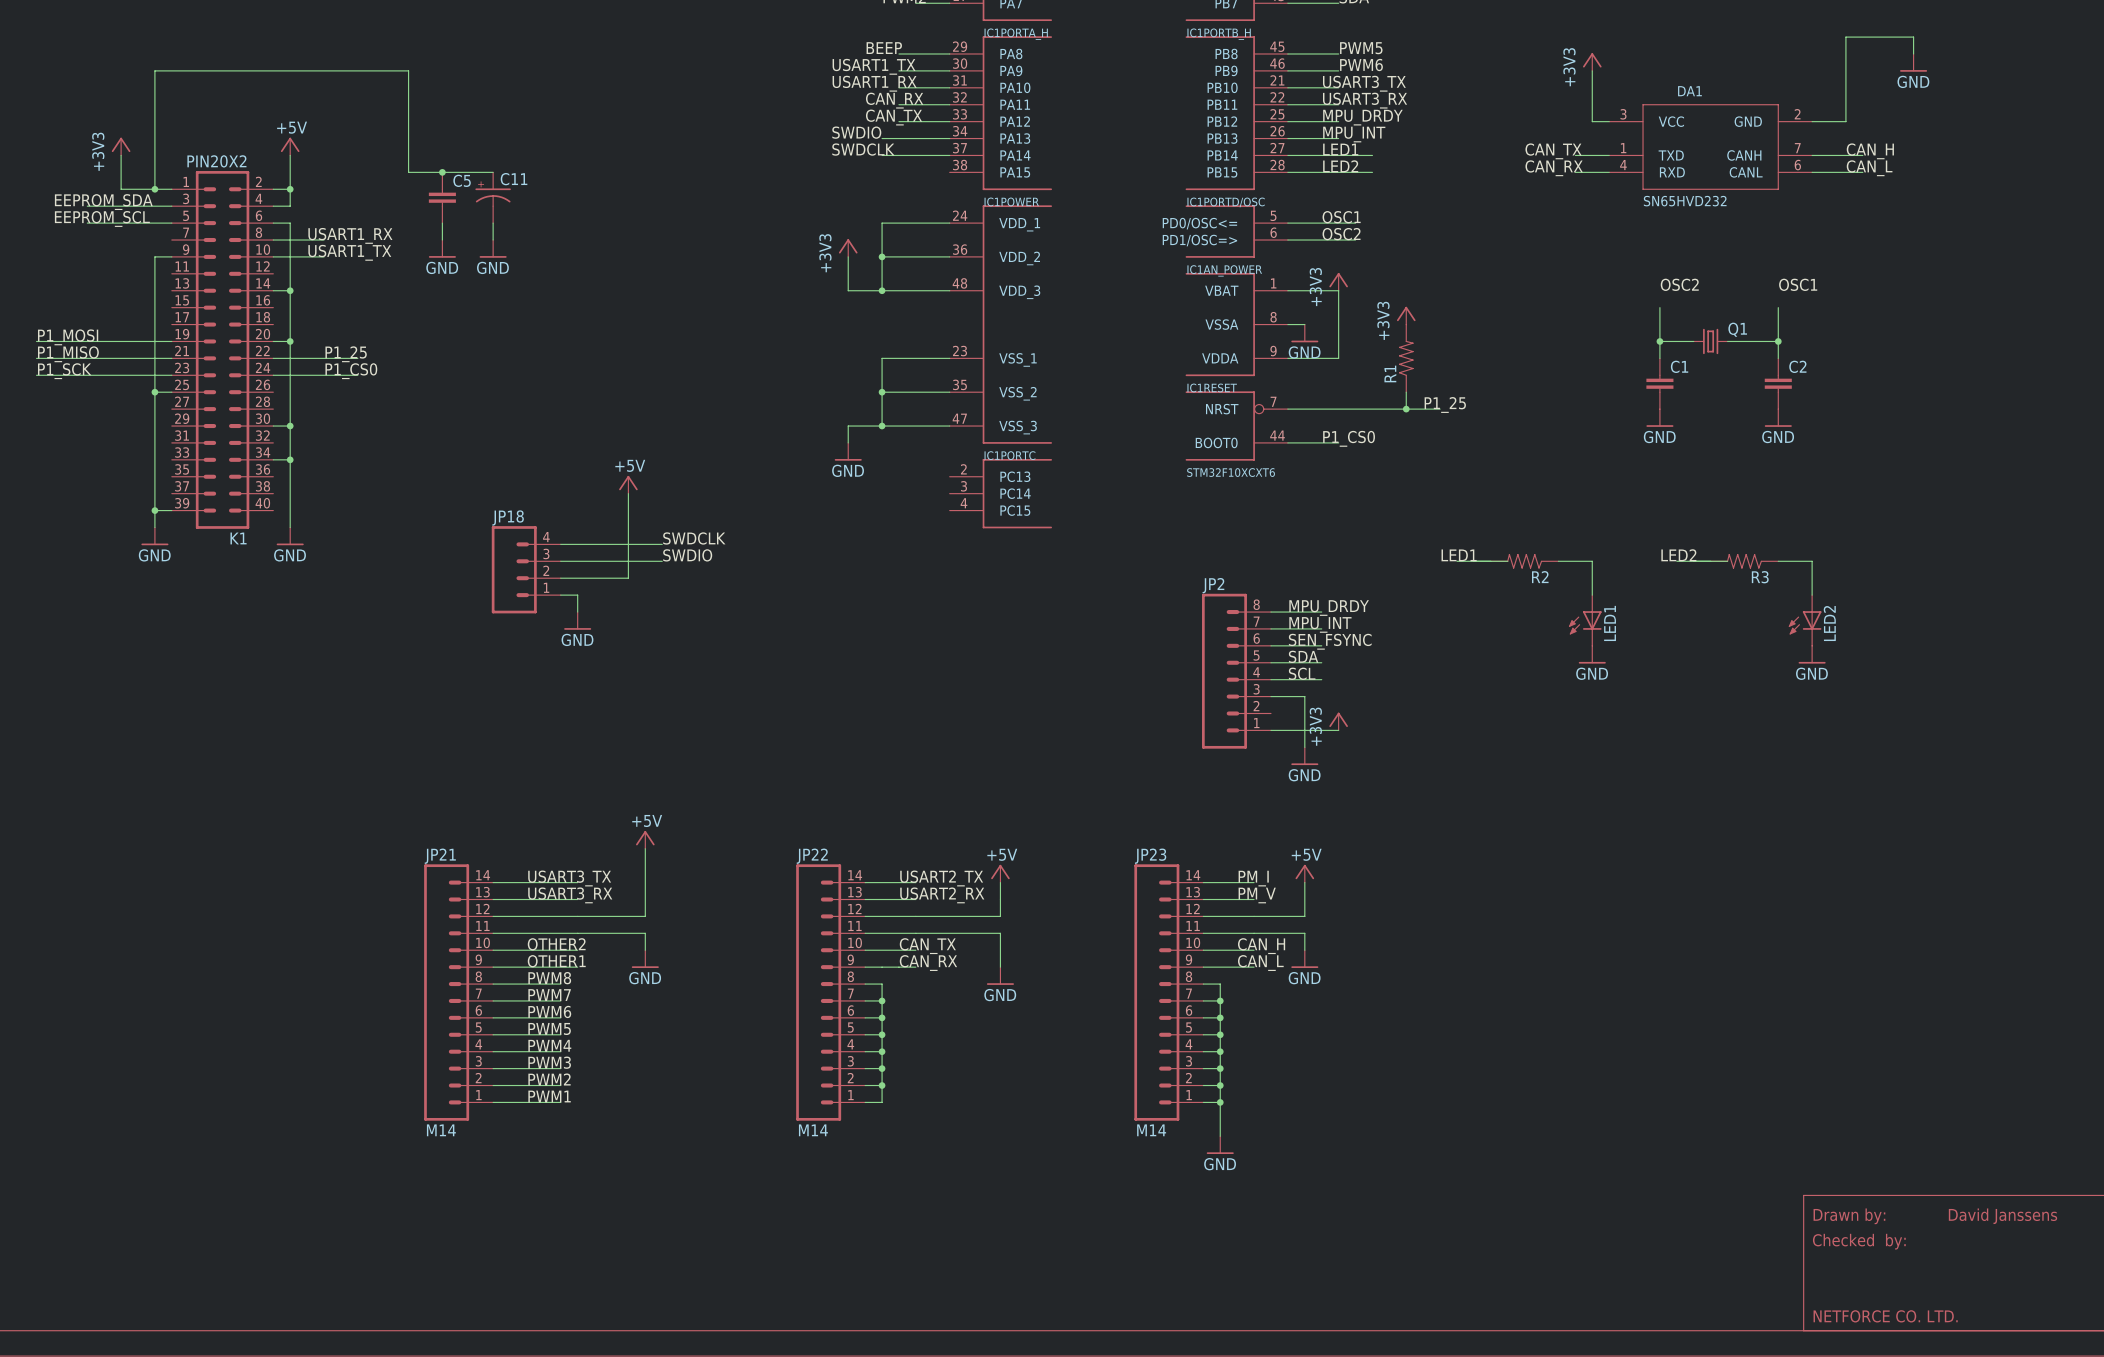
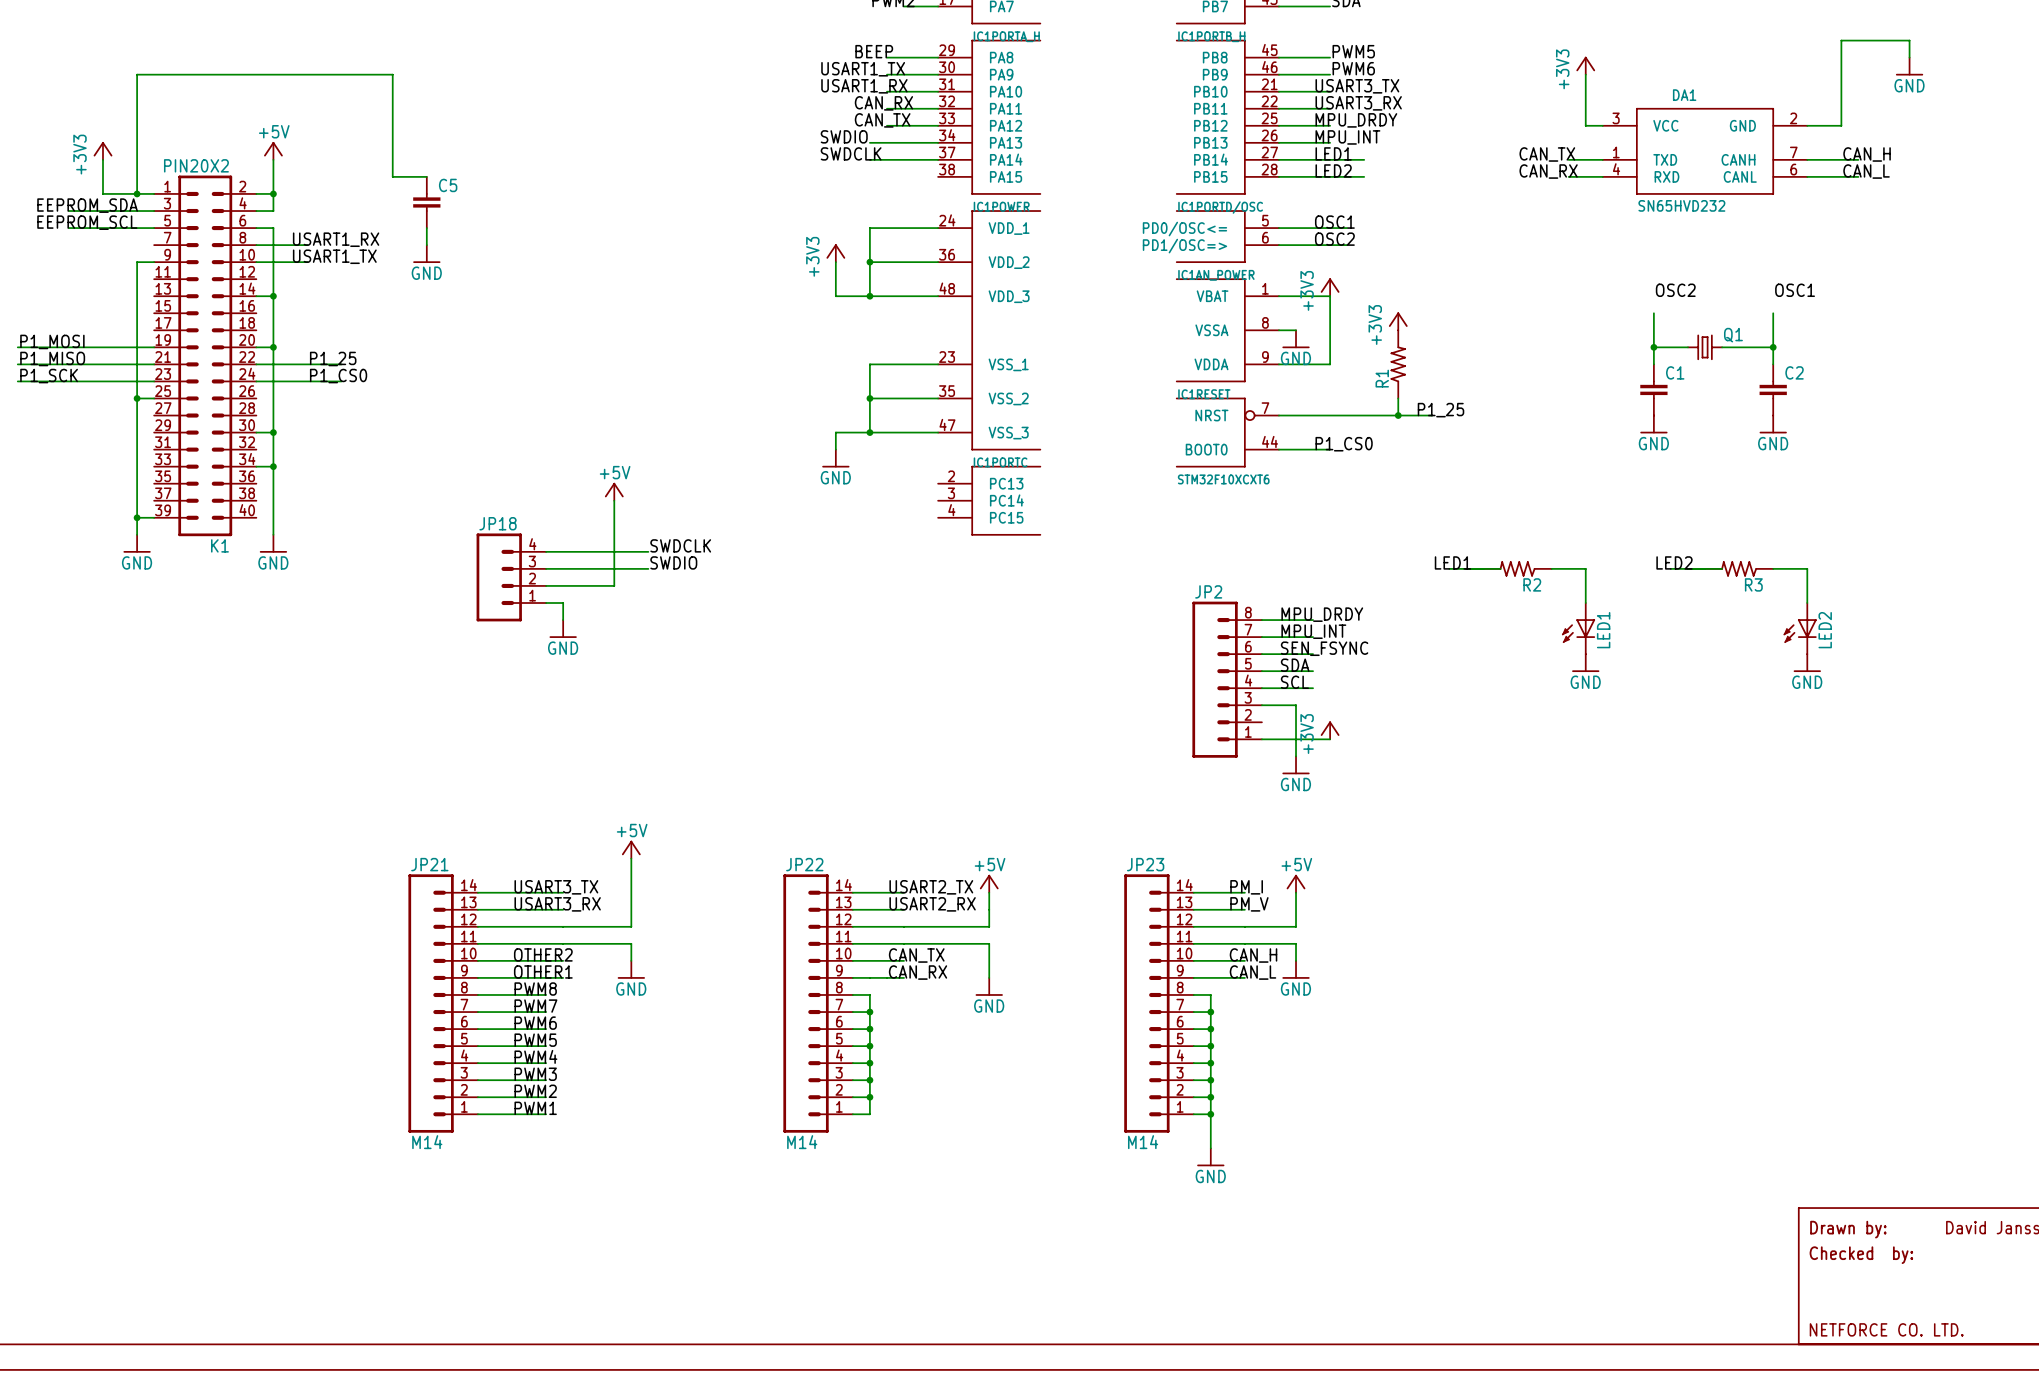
wire: (442, 172) (493, 172) -> none
junction: (442, 172) -> none
C11: (493, 197) -> none
wire: (493, 223) (493, 240) -> none
power symbol: GND (493, 248) -> none

